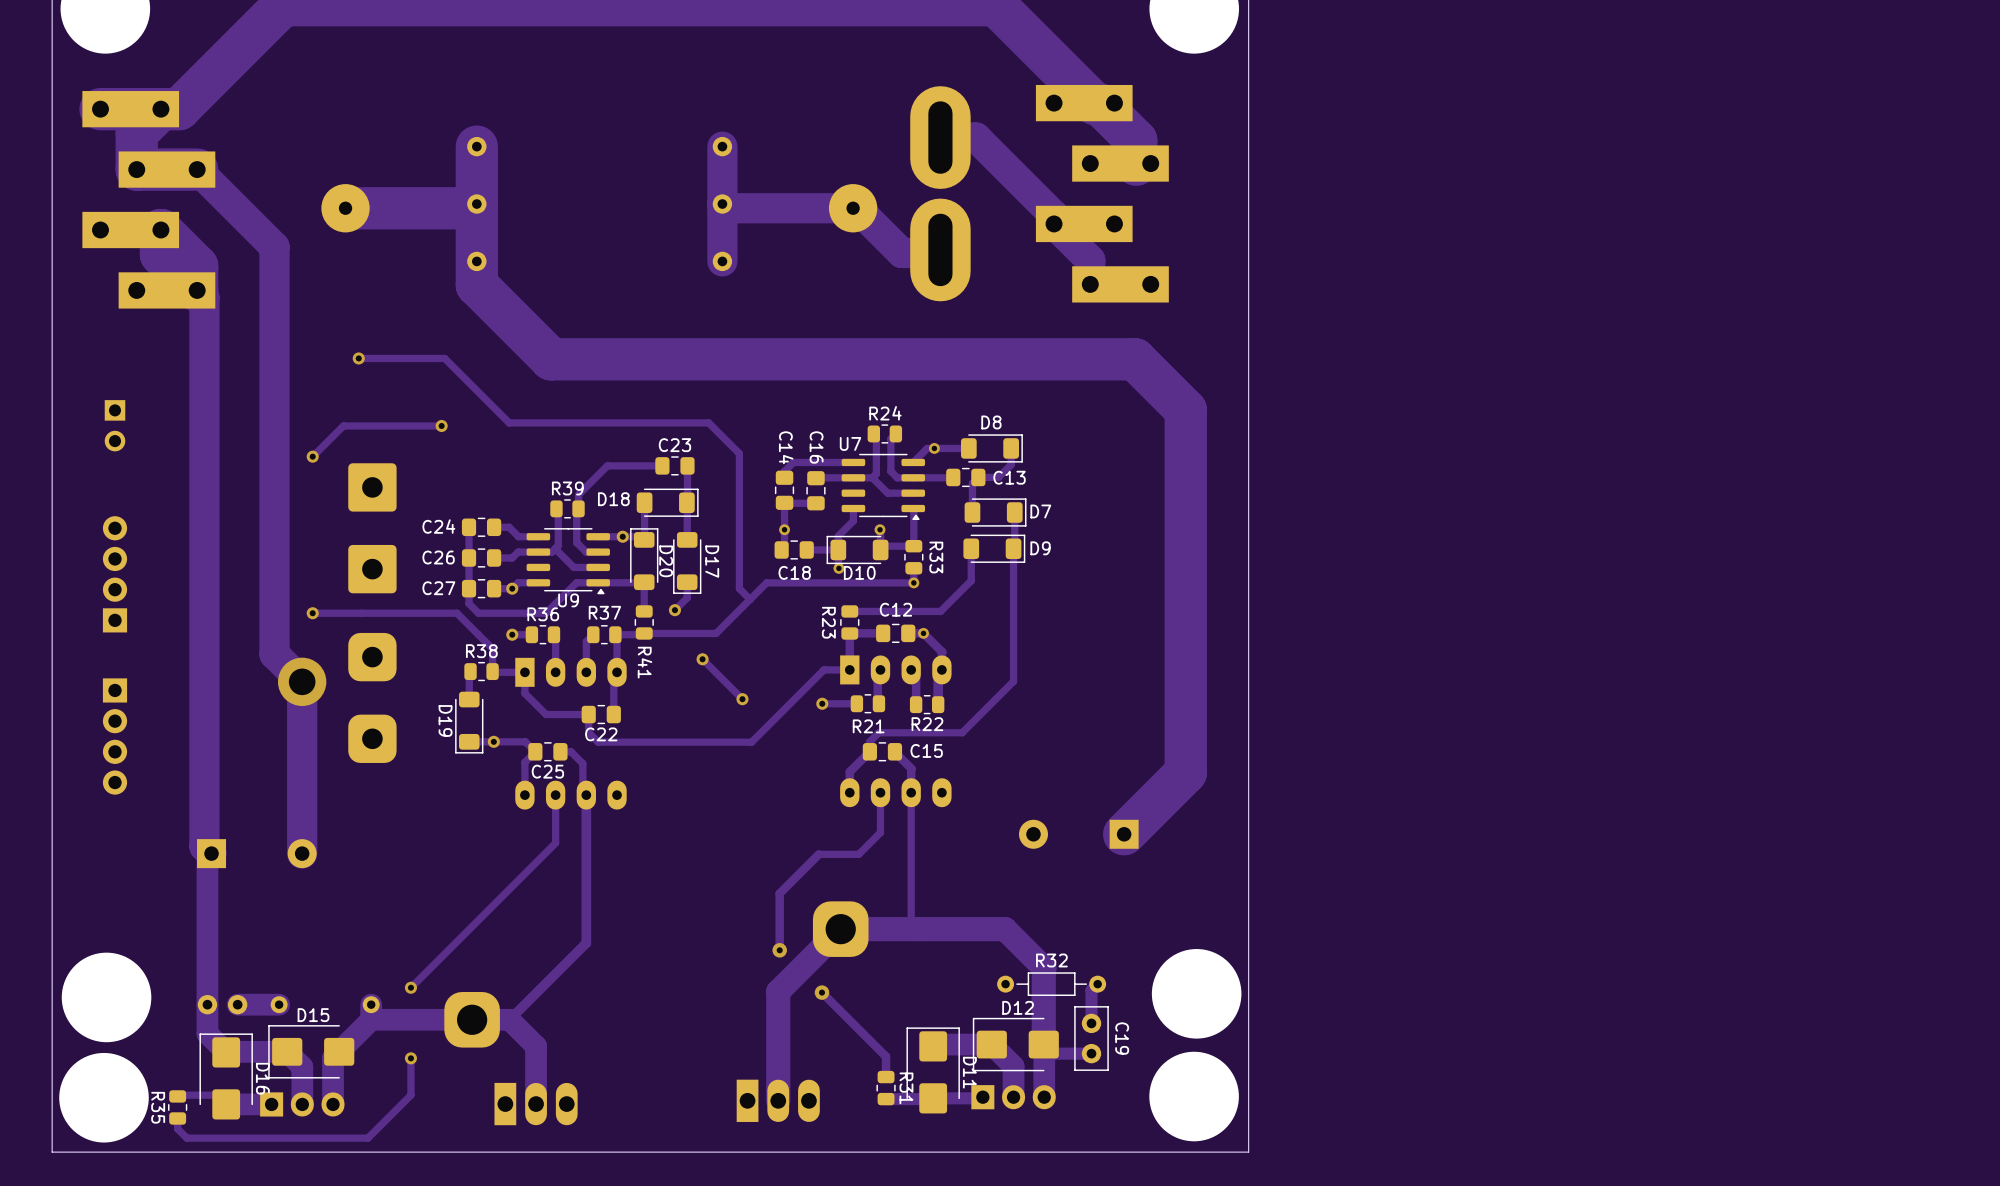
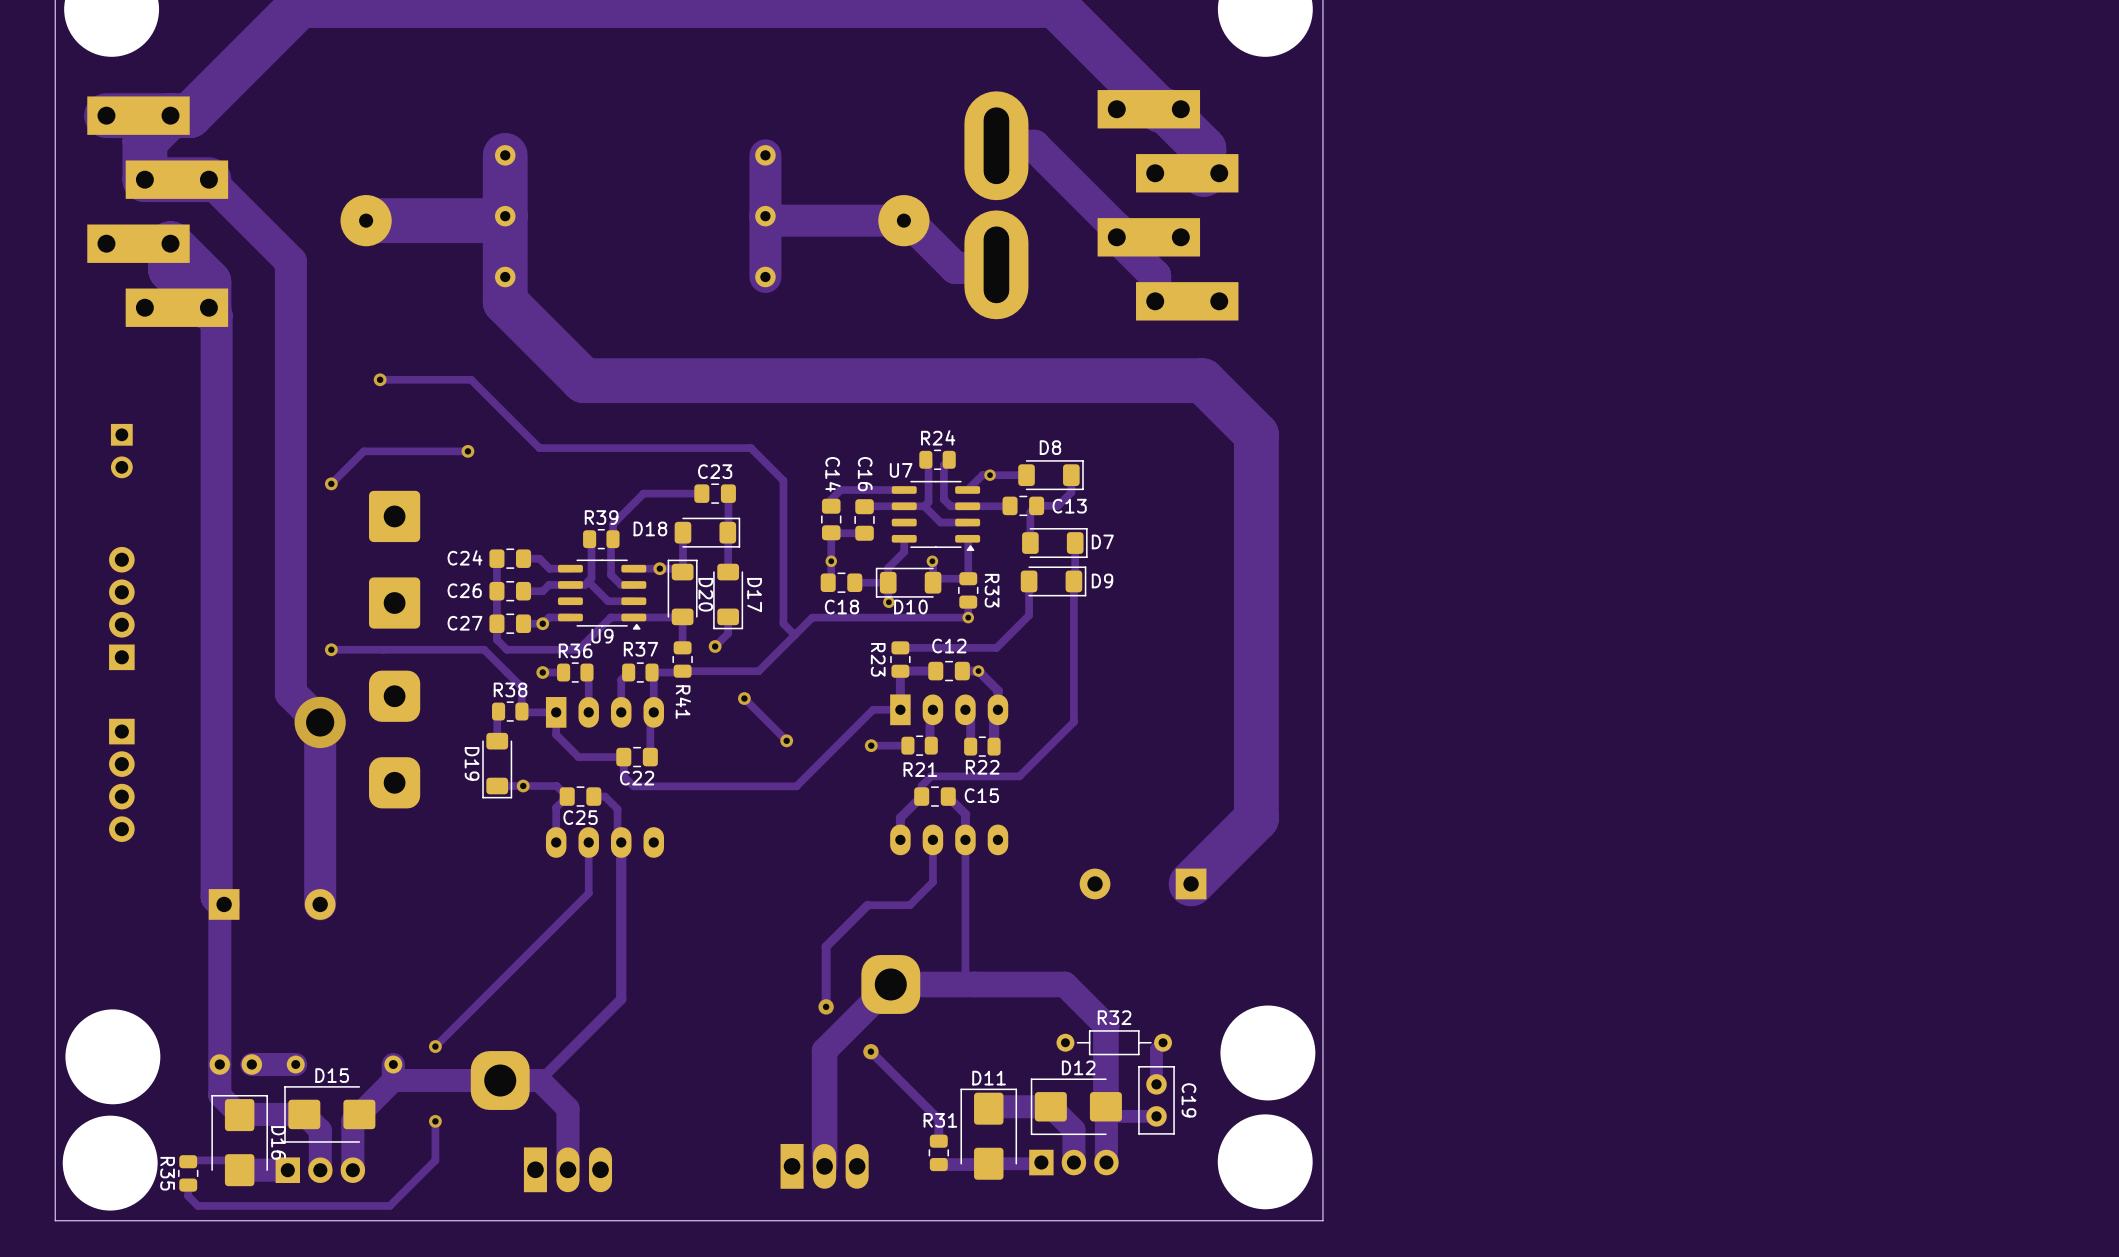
D11 name rotation: 0° (969, 1072) -> 90° counterclockwise (989, 1078)
D11 name position: D11 (969, 1072) -> D11 (989, 1078)
R31 name rotation: 0° (906, 1088) -> 90° counterclockwise (940, 1120)

